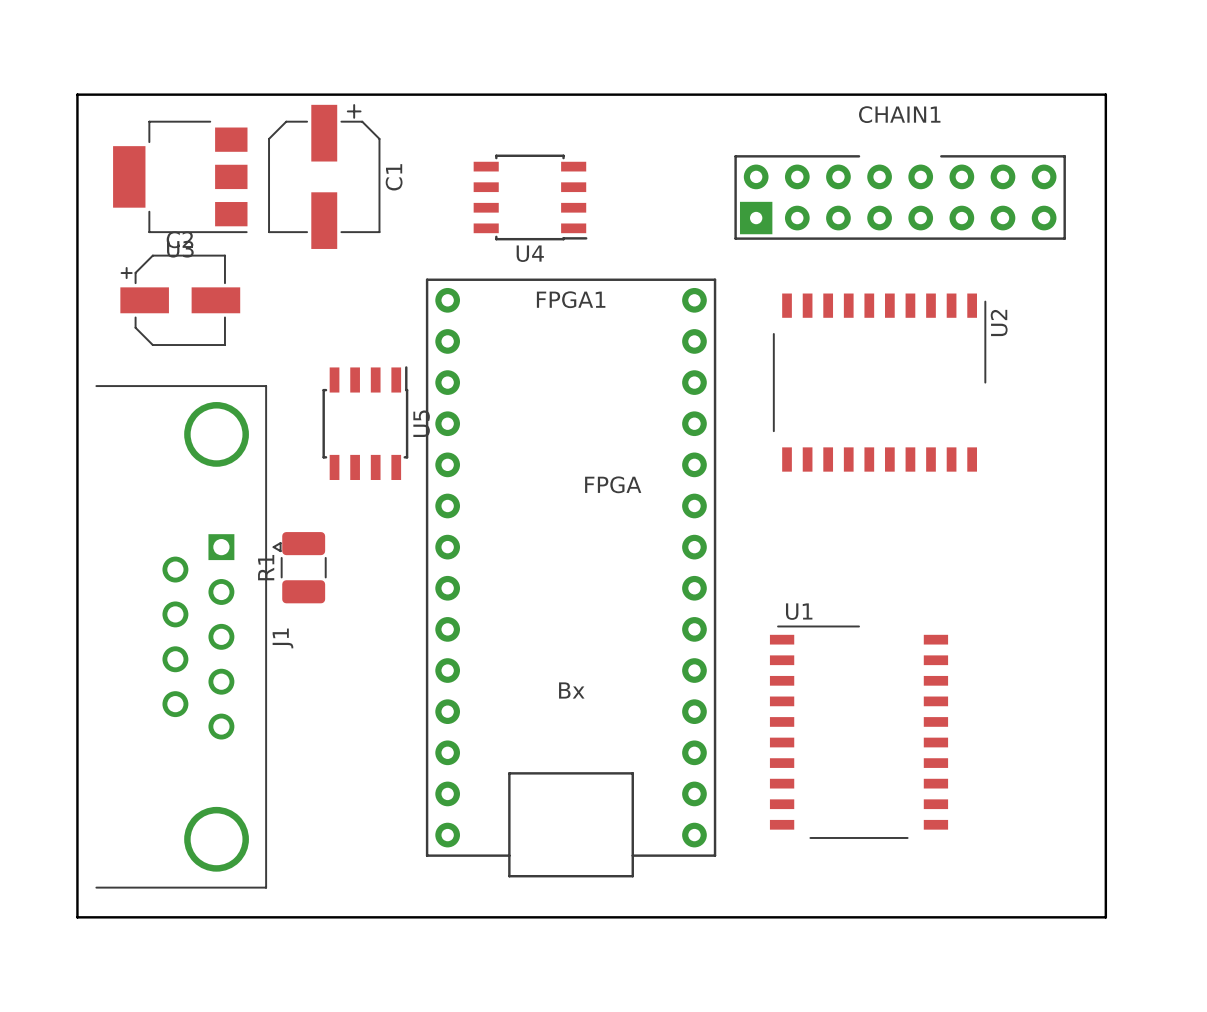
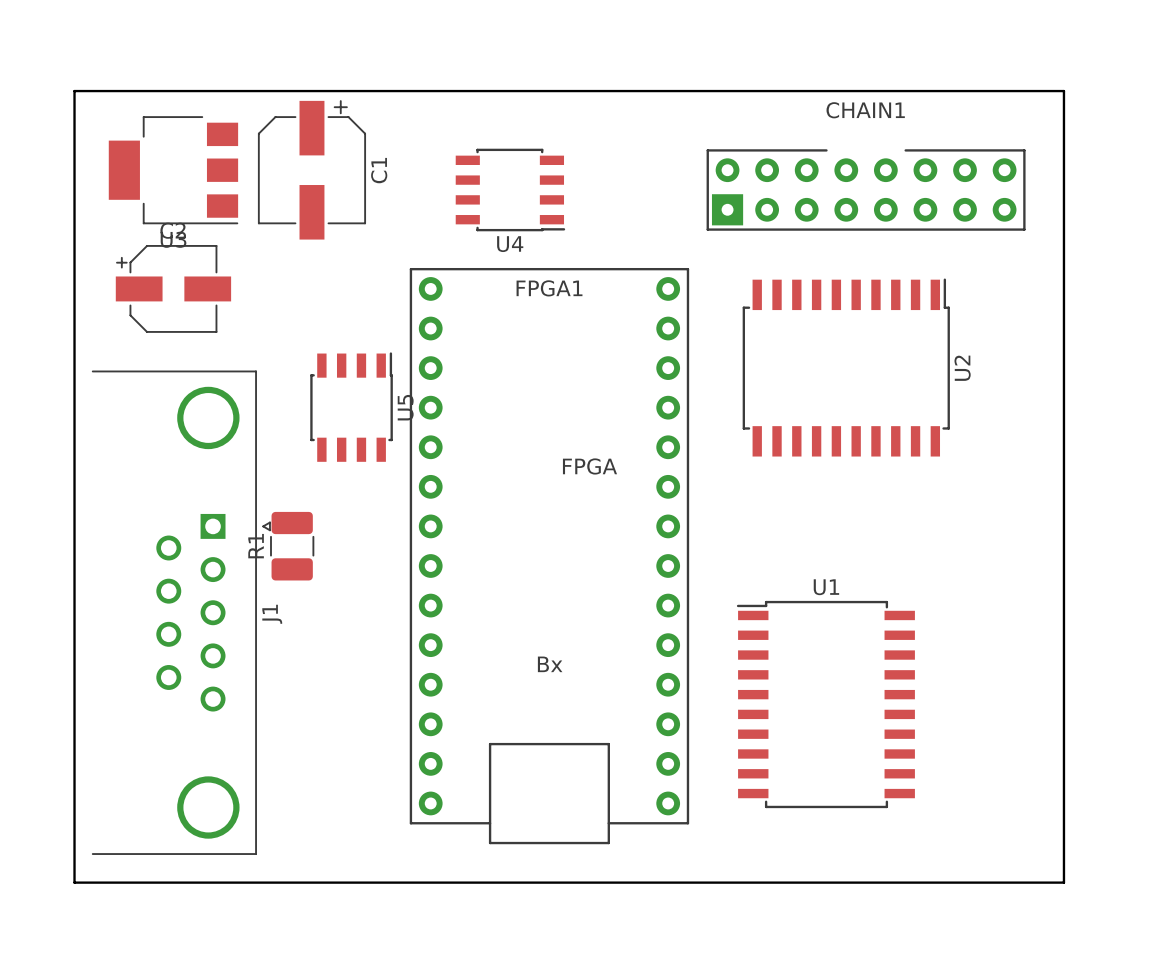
U2 footprint: [772, 293, 987, 472] -> [742, 278, 950, 457]
U2 name position: U2 (999, 322) -> U2 (962, 368)
U1 name position: U1 (799, 611) -> U1 (826, 587)
U1 footprint: [769, 625, 949, 839] -> [736, 600, 915, 809]

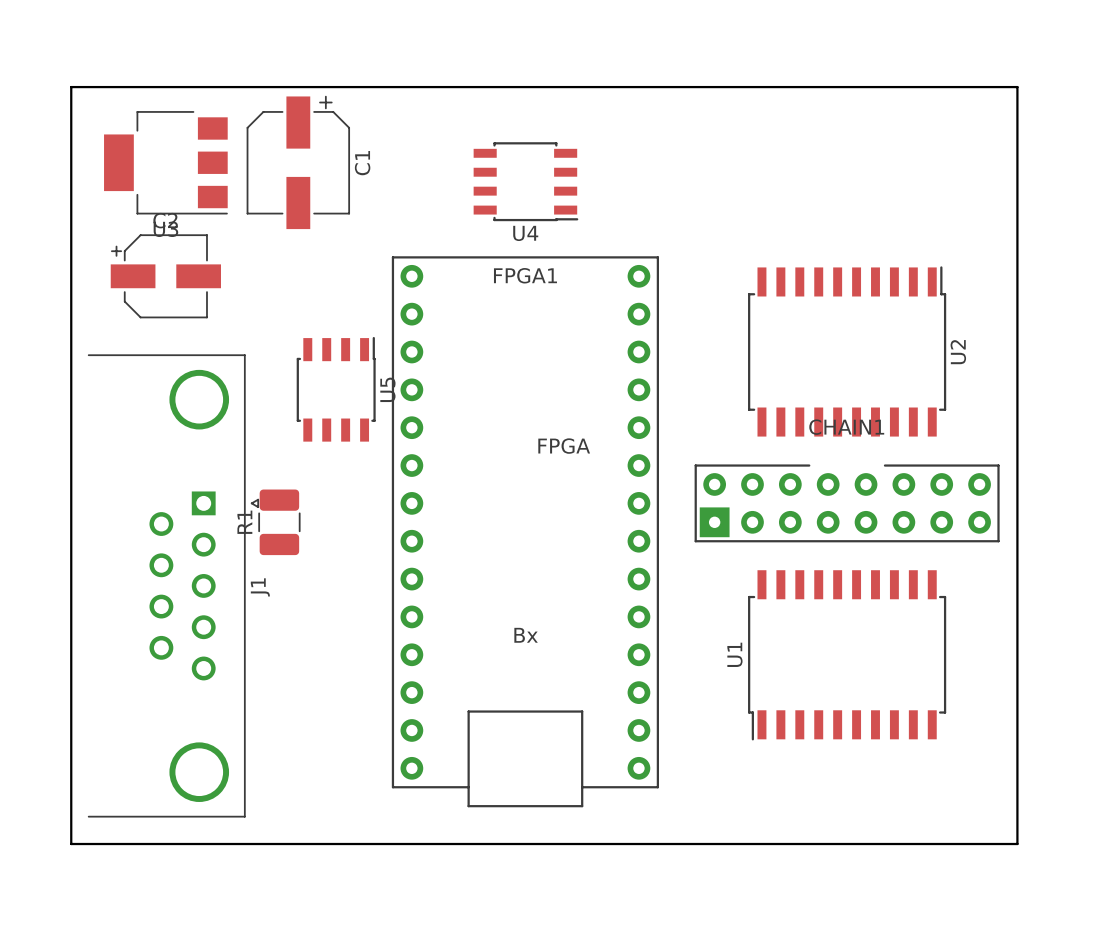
U4 position: (510, 190) -> (525, 181)
CHAIN1 position: (866, 190) -> (847, 503)
U2 position: (846, 367) -> (847, 351)
U1 rotation: 0° (825, 704) -> 90° counterclockwise (847, 655)

